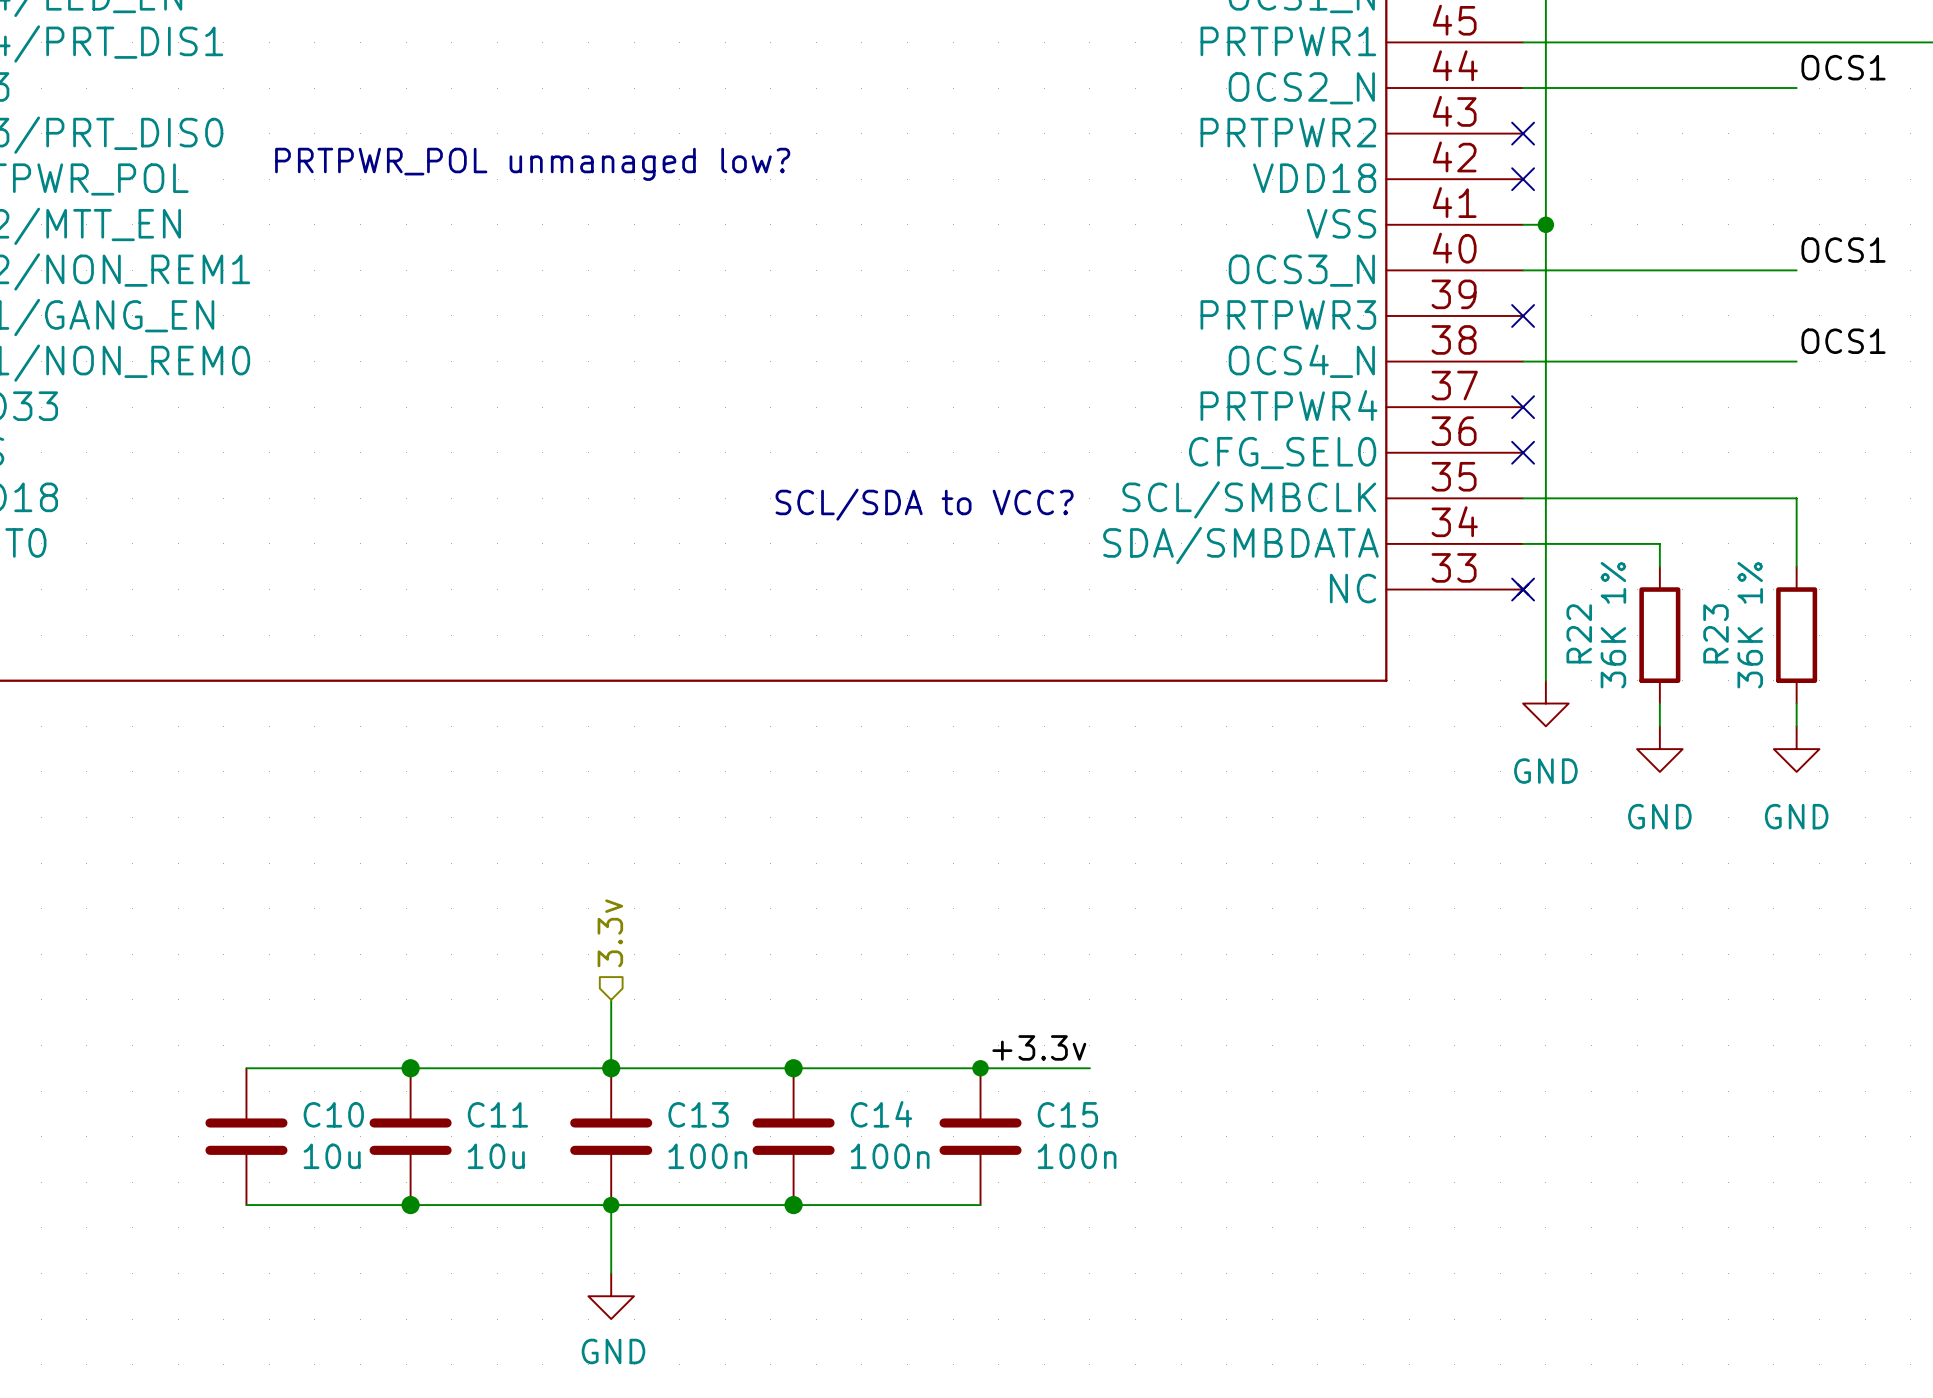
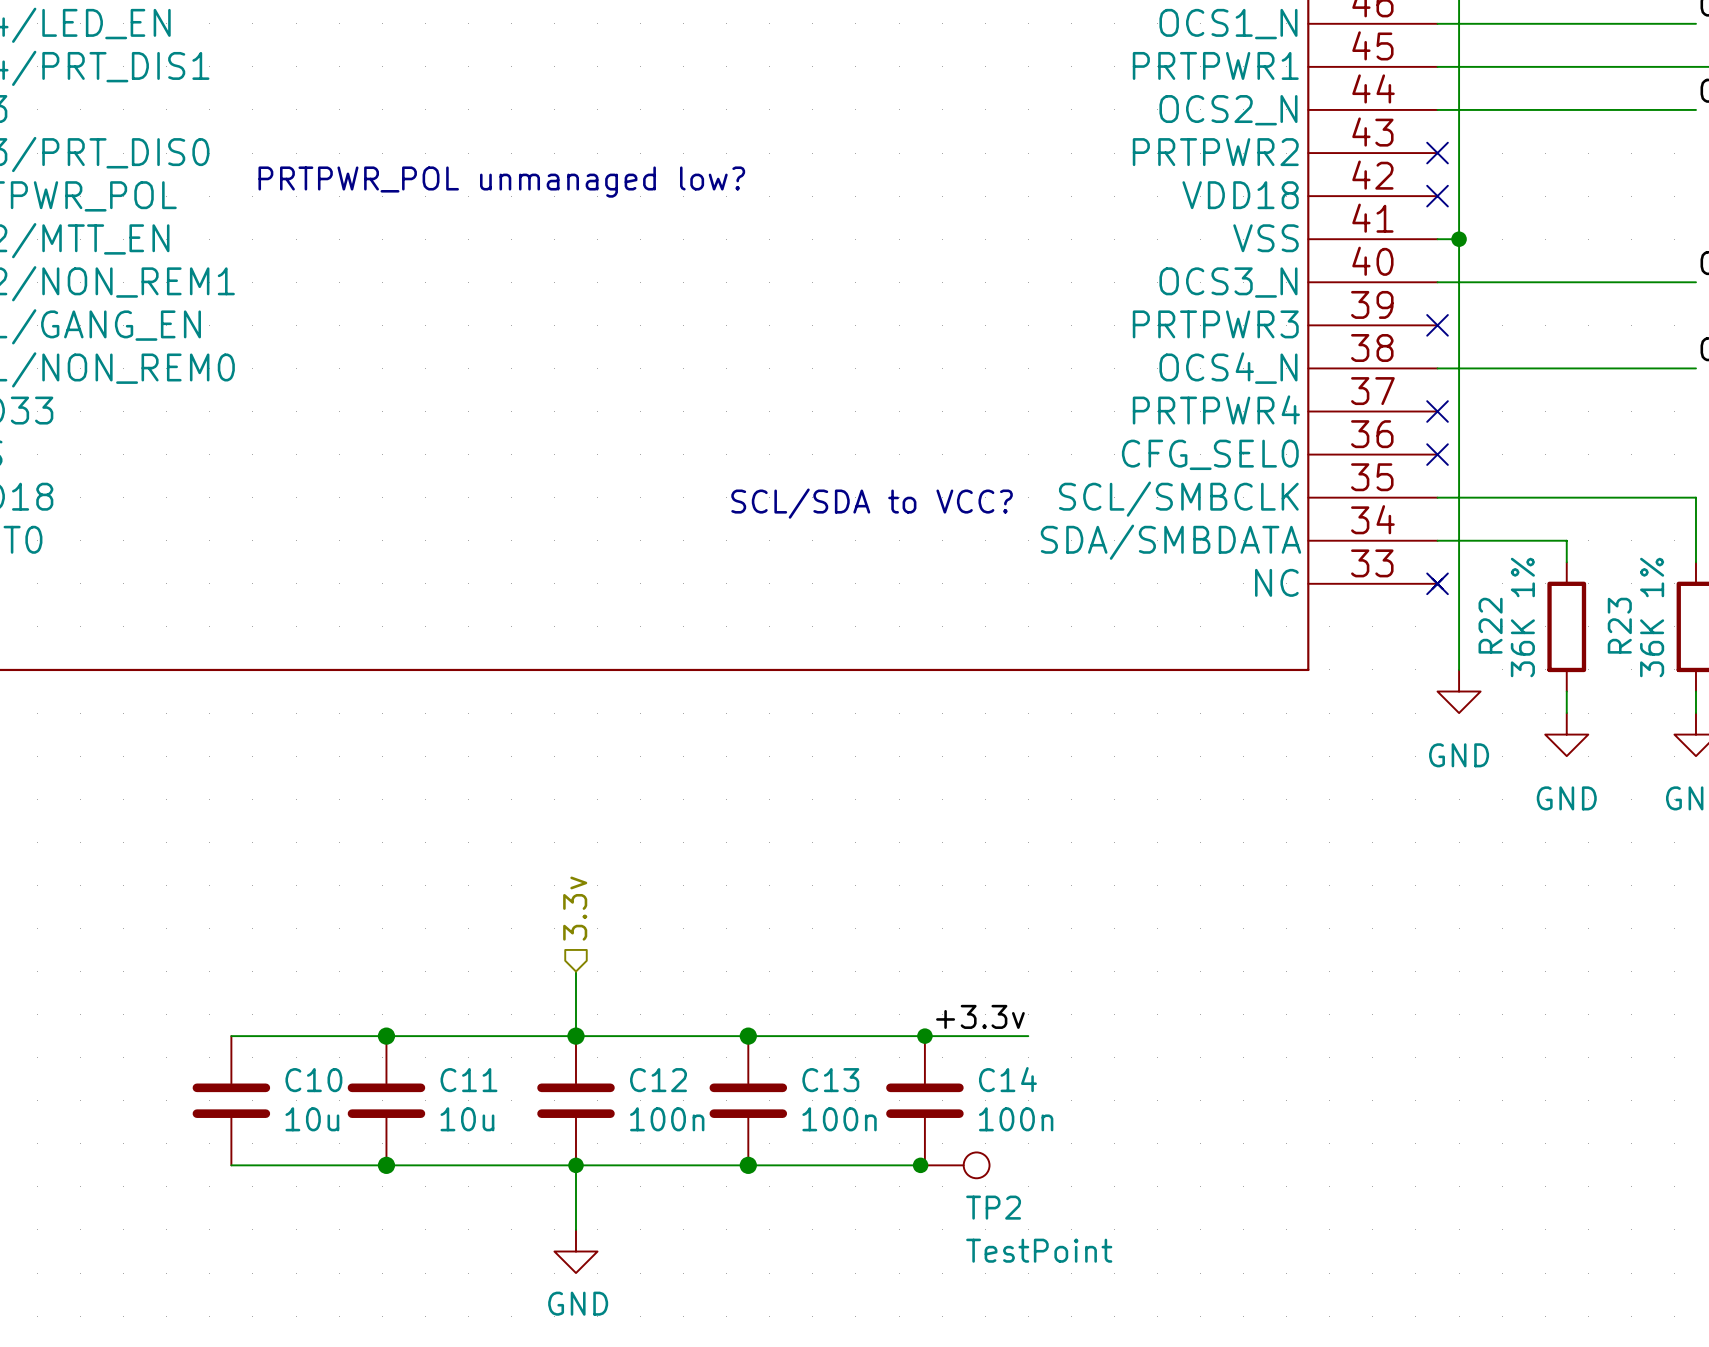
C13 name: C13 (698, 1114) -> C12 (658, 1080)
C14 name: C14 (881, 1114) -> C13 (830, 1080)
C15 name: C15 (1067, 1114) -> C14 (1007, 1079)
junction: none -> (920, 1165)
TP2: none -> TestPoint (955, 1165)

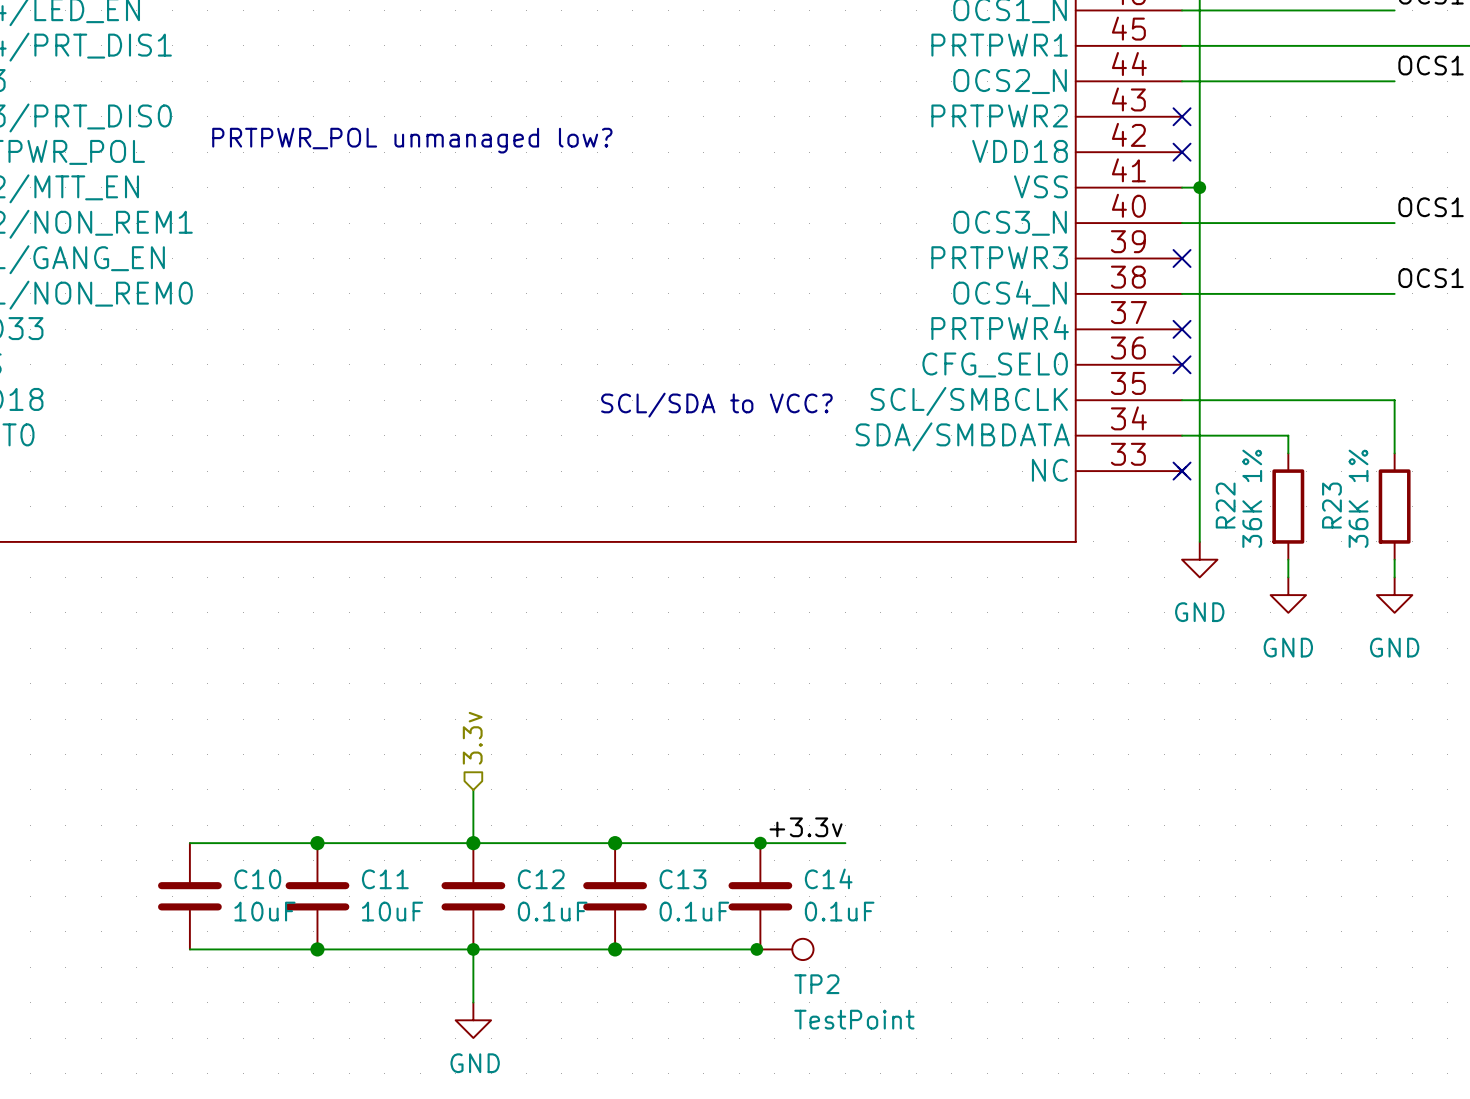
C10 value: 10u (312, 1119) -> 10uF (264, 911)
C11 value: 10u (467, 1119) -> 10uF (392, 911)
C12 value: 100n (667, 1119) -> 0.1uF (552, 911)
C13 value: 100n (839, 1119) -> 0.1uF (694, 911)
C14 value: 100n (1016, 1119) -> 0.1uF (839, 911)

